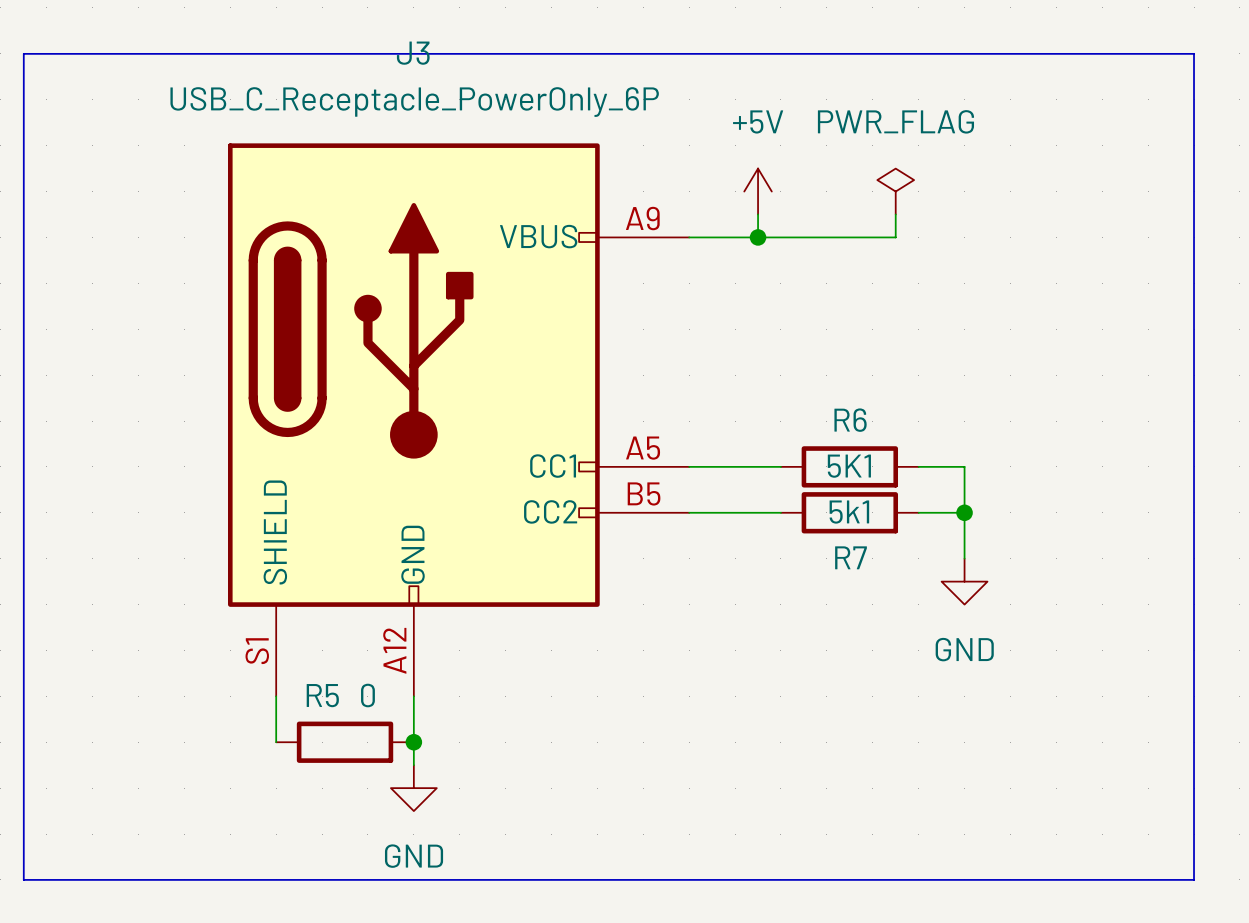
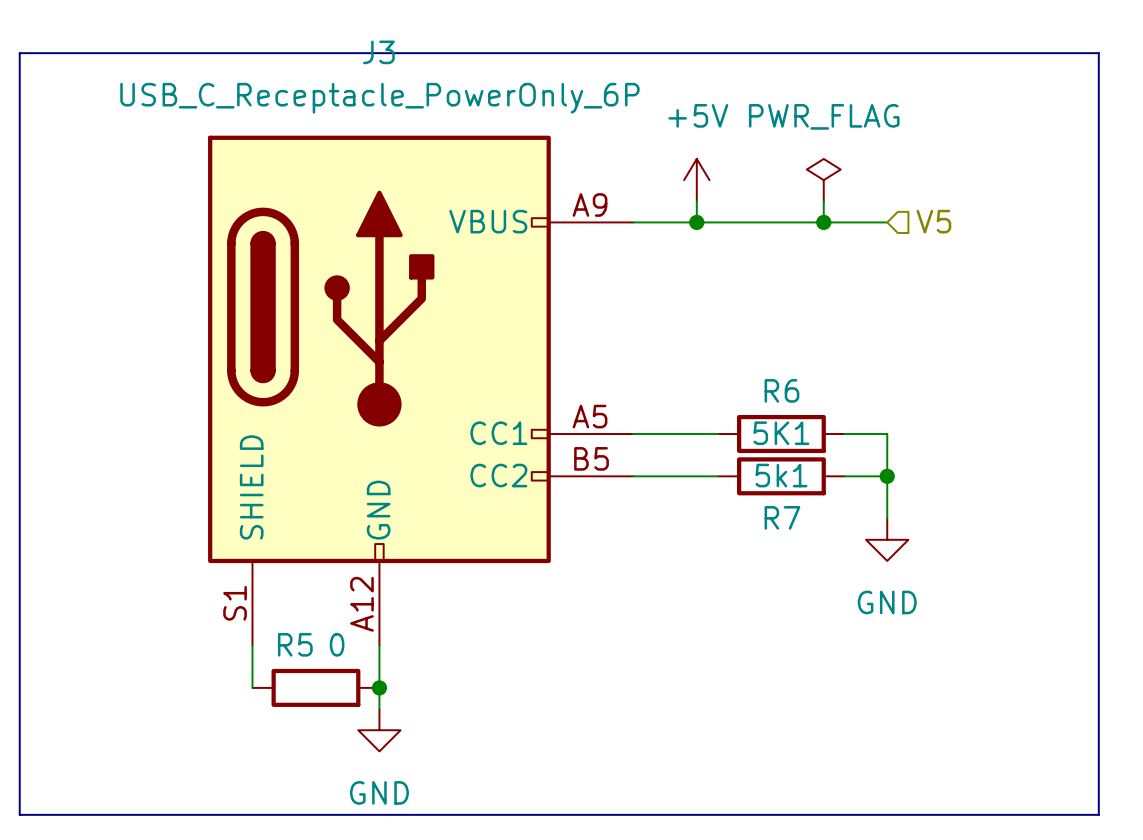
hierarchical label: none -> V5 (933, 221)
wire: none -> (823, 222) (887, 222)
junction: none -> (823, 222)

